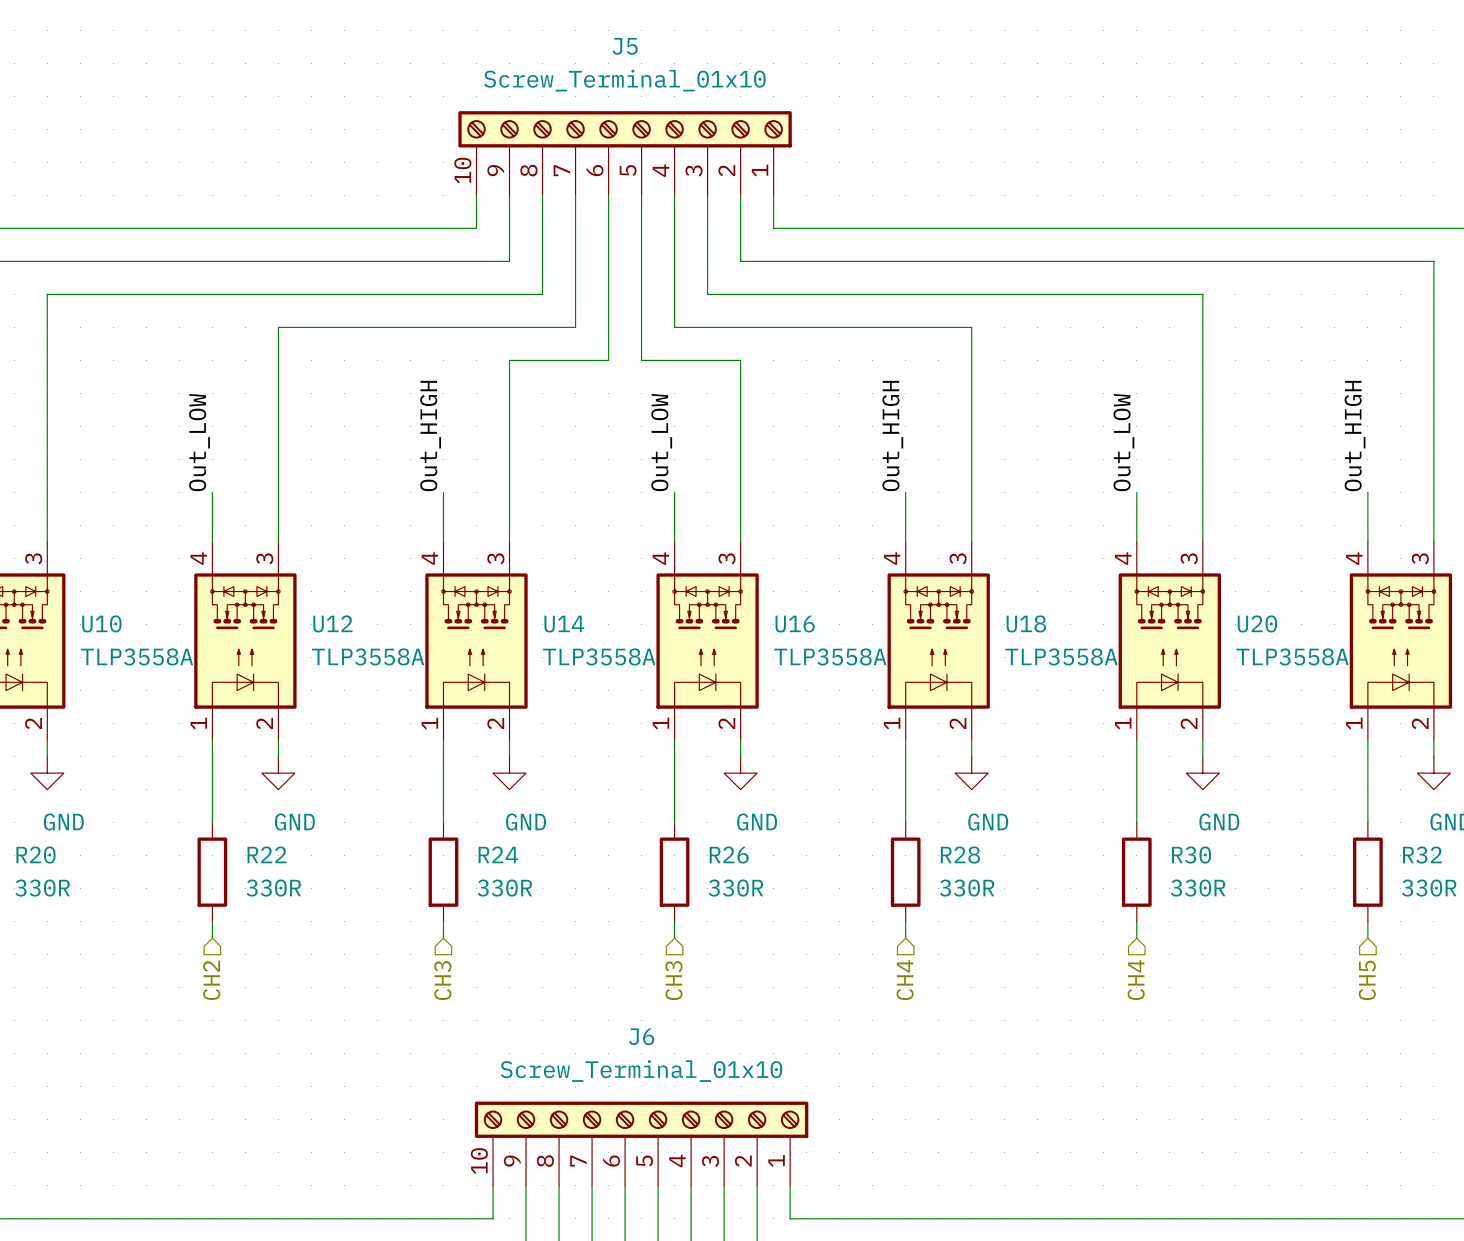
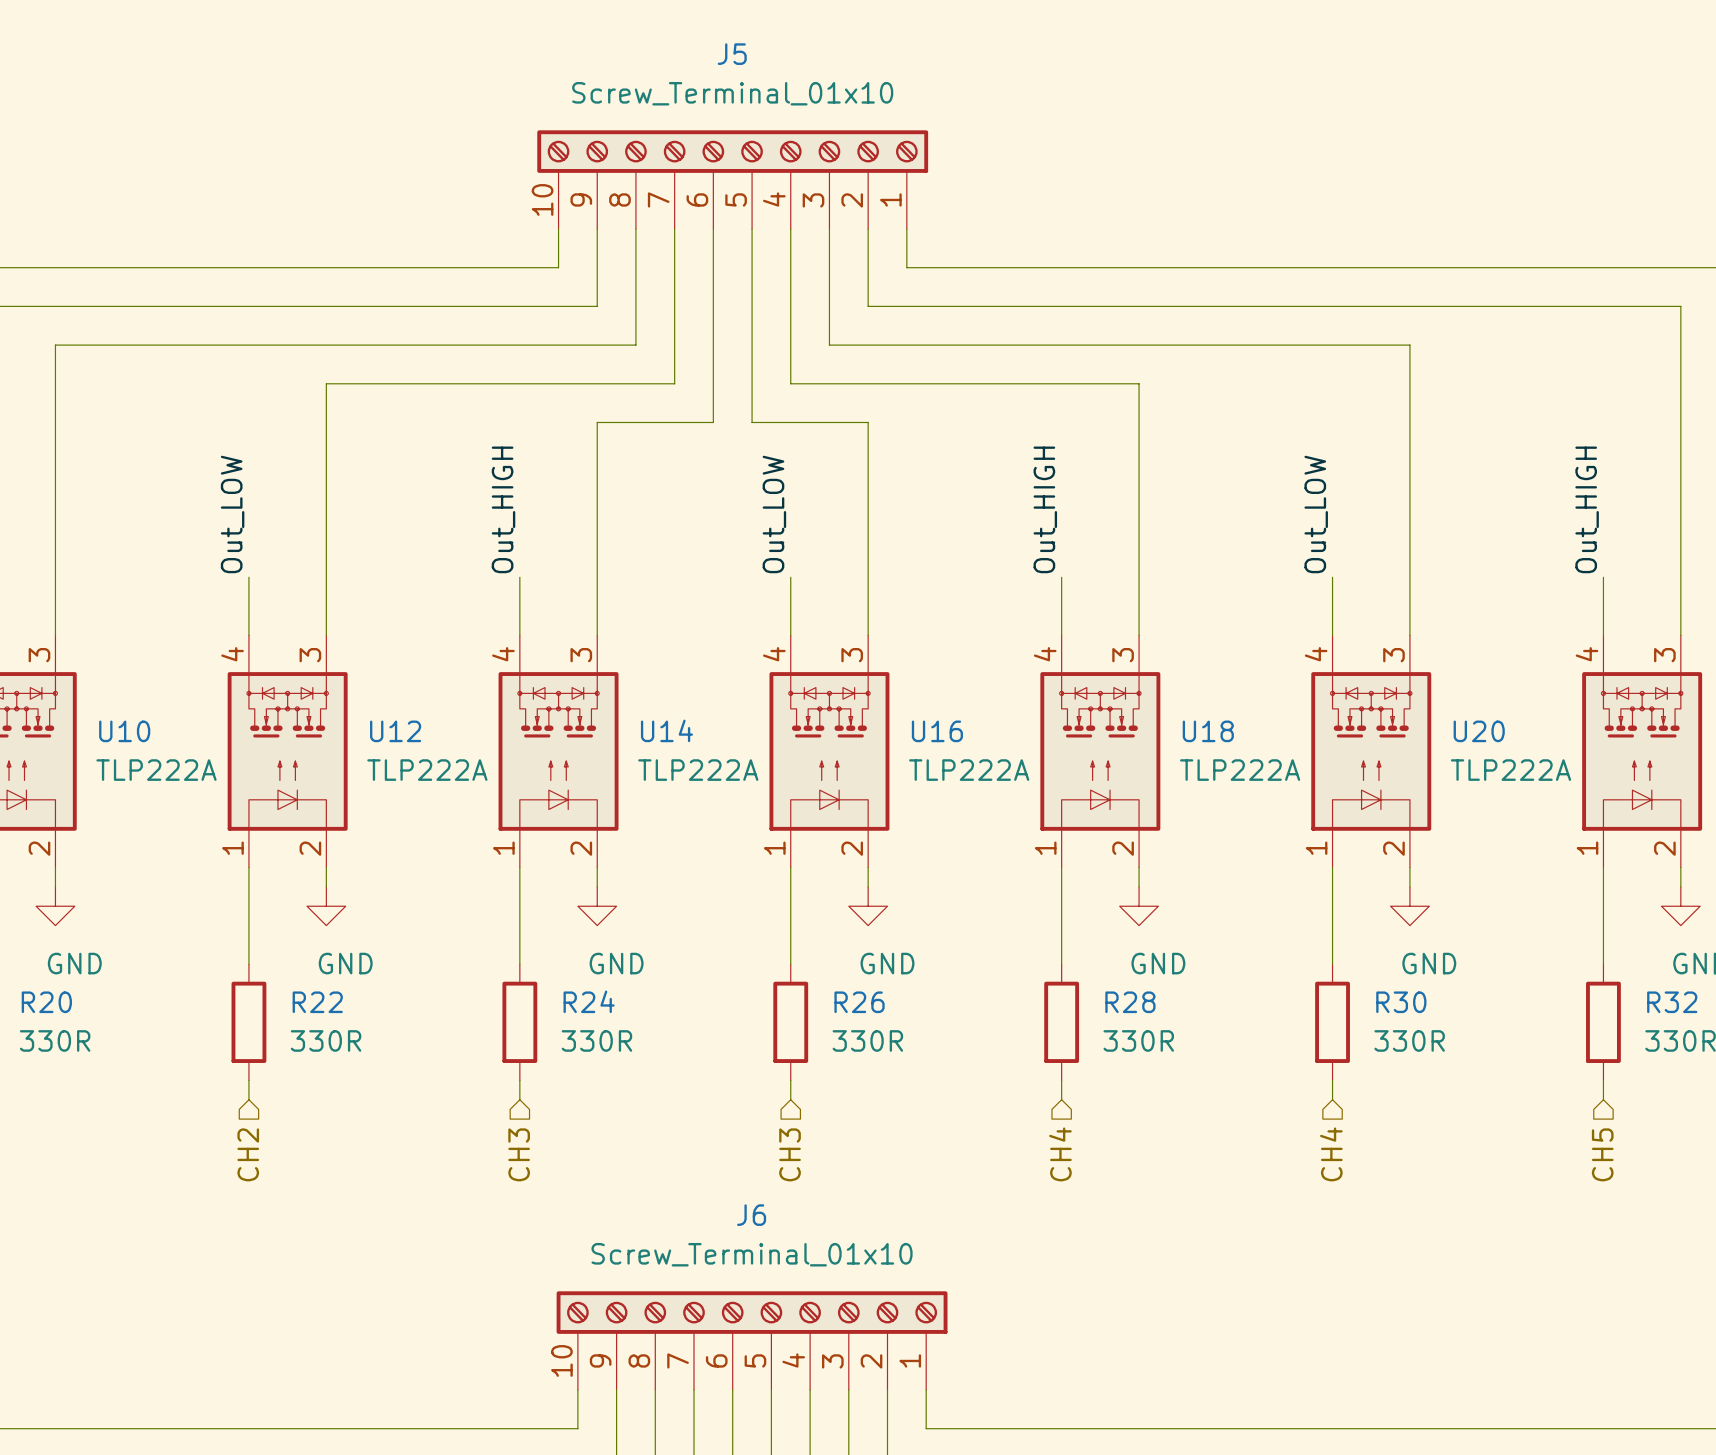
U10 value: TLP3558A (137, 656) -> TLP222A (156, 770)
U12 value: TLP3558A (368, 656) -> TLP222A (427, 770)
U14 value: TLP3558A (599, 656) -> TLP222A (698, 770)
U16 value: TLP3558A (830, 656) -> TLP222A (969, 770)
U18 value: TLP3558A (1061, 656) -> TLP222A (1240, 770)
U20 value: TLP3558A (1292, 656) -> TLP222A (1510, 770)

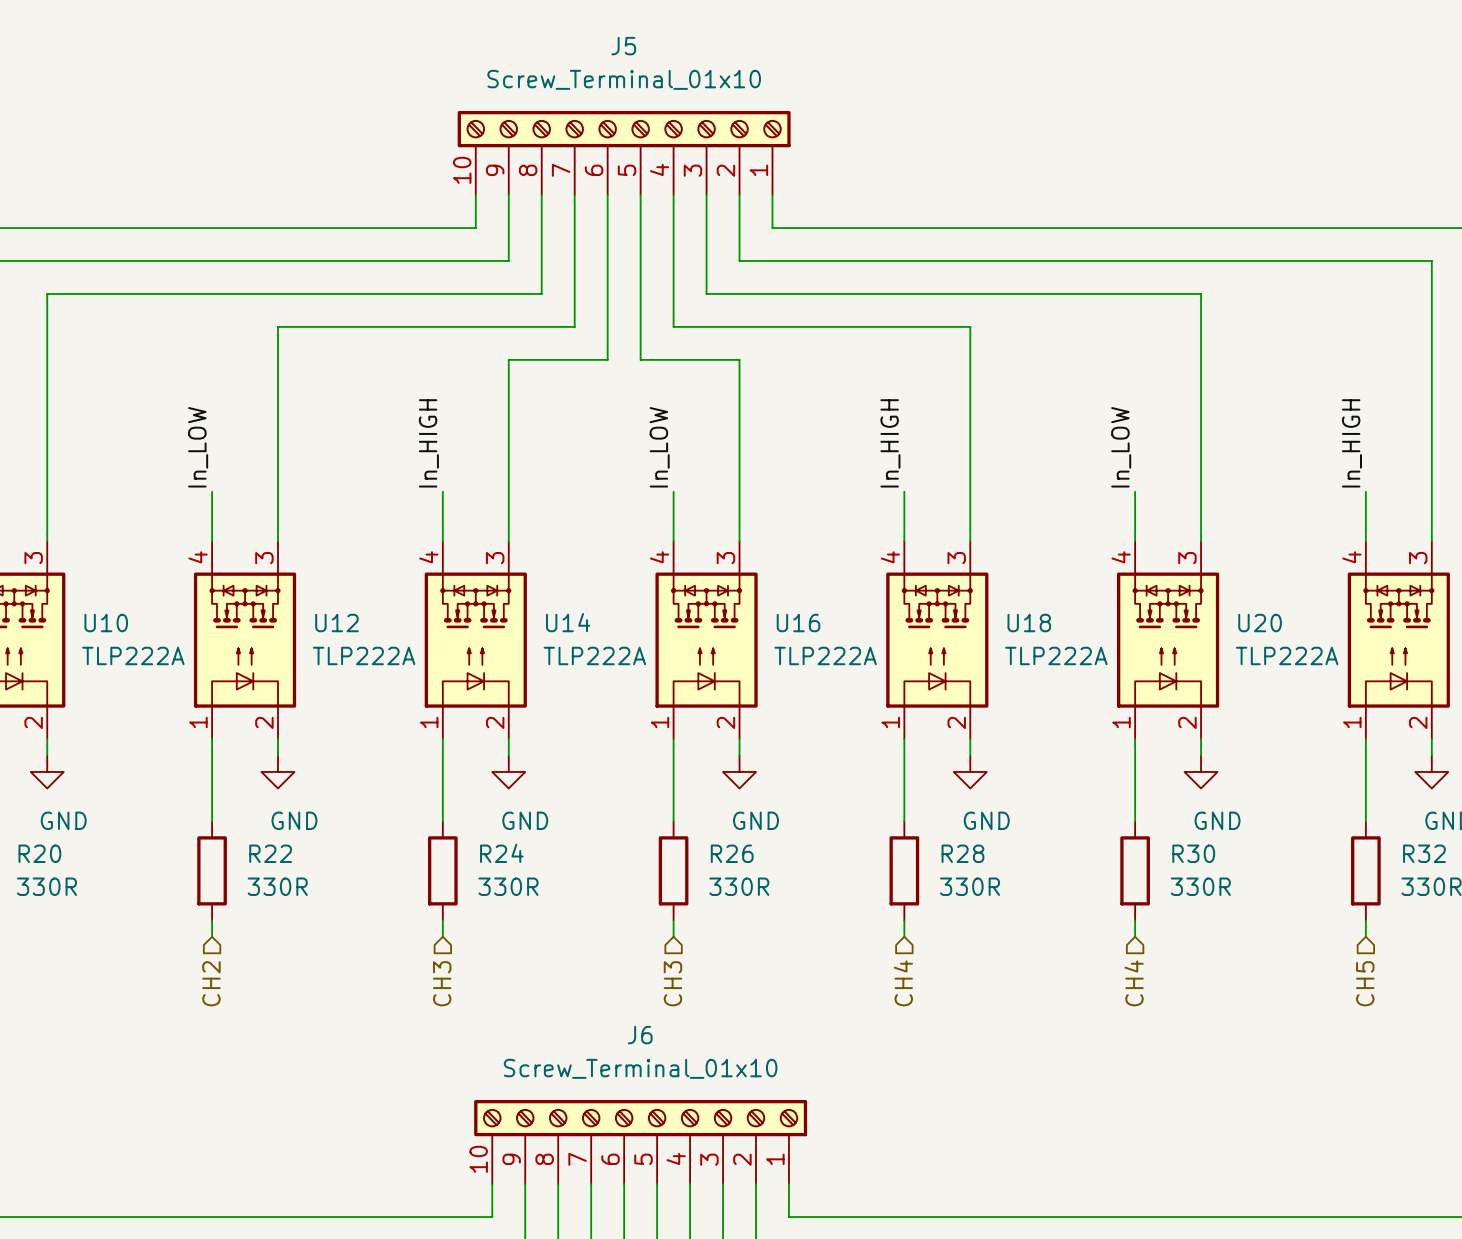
label: Out_HIGH (503, 509) -> In_HIGH (428, 443)
label: Out_HIGH (1045, 509) -> In_HIGH (890, 443)
label: Out_HIGH (1587, 509) -> In_HIGH (1351, 443)
label: Out_LOW (232, 514) -> In_LOW (198, 447)
label: Out_LOW (774, 514) -> In_LOW (659, 447)
label: Out_LOW (1316, 514) -> In_LOW (1121, 447)

